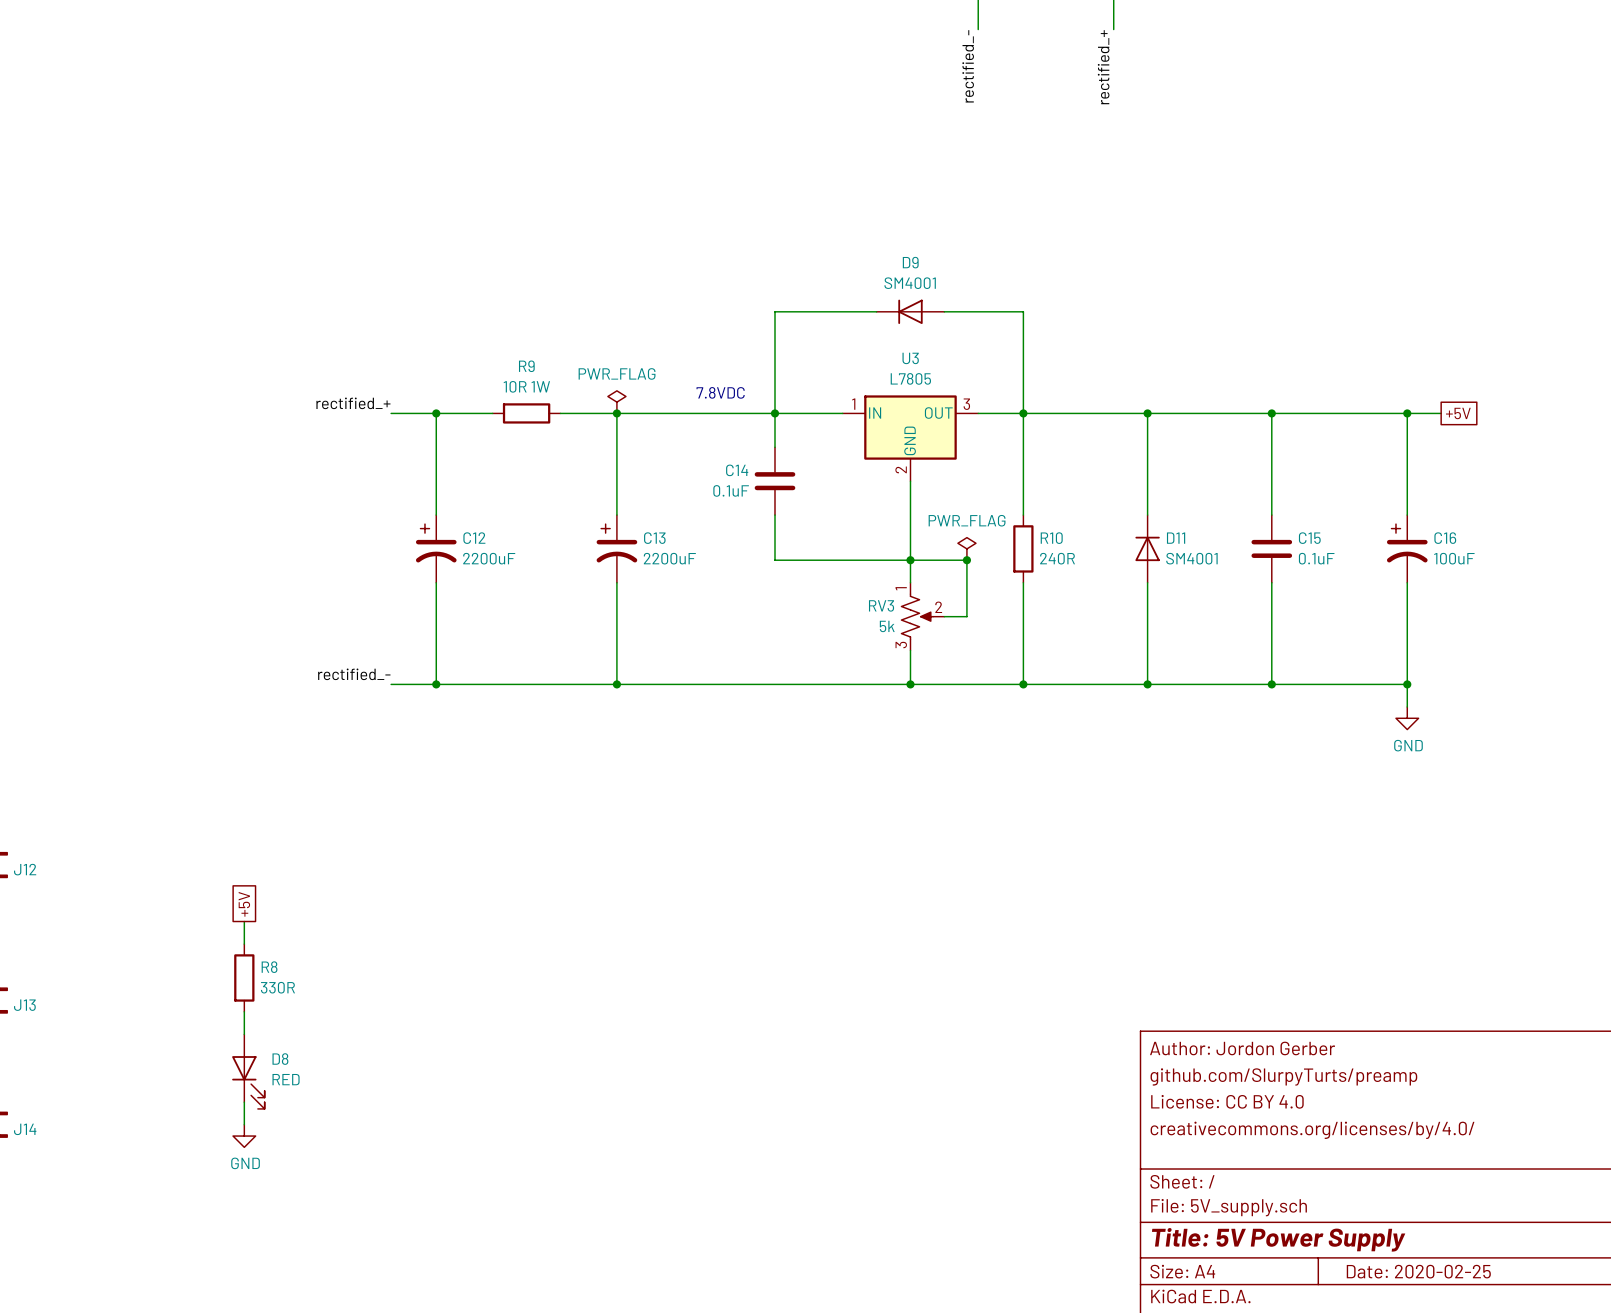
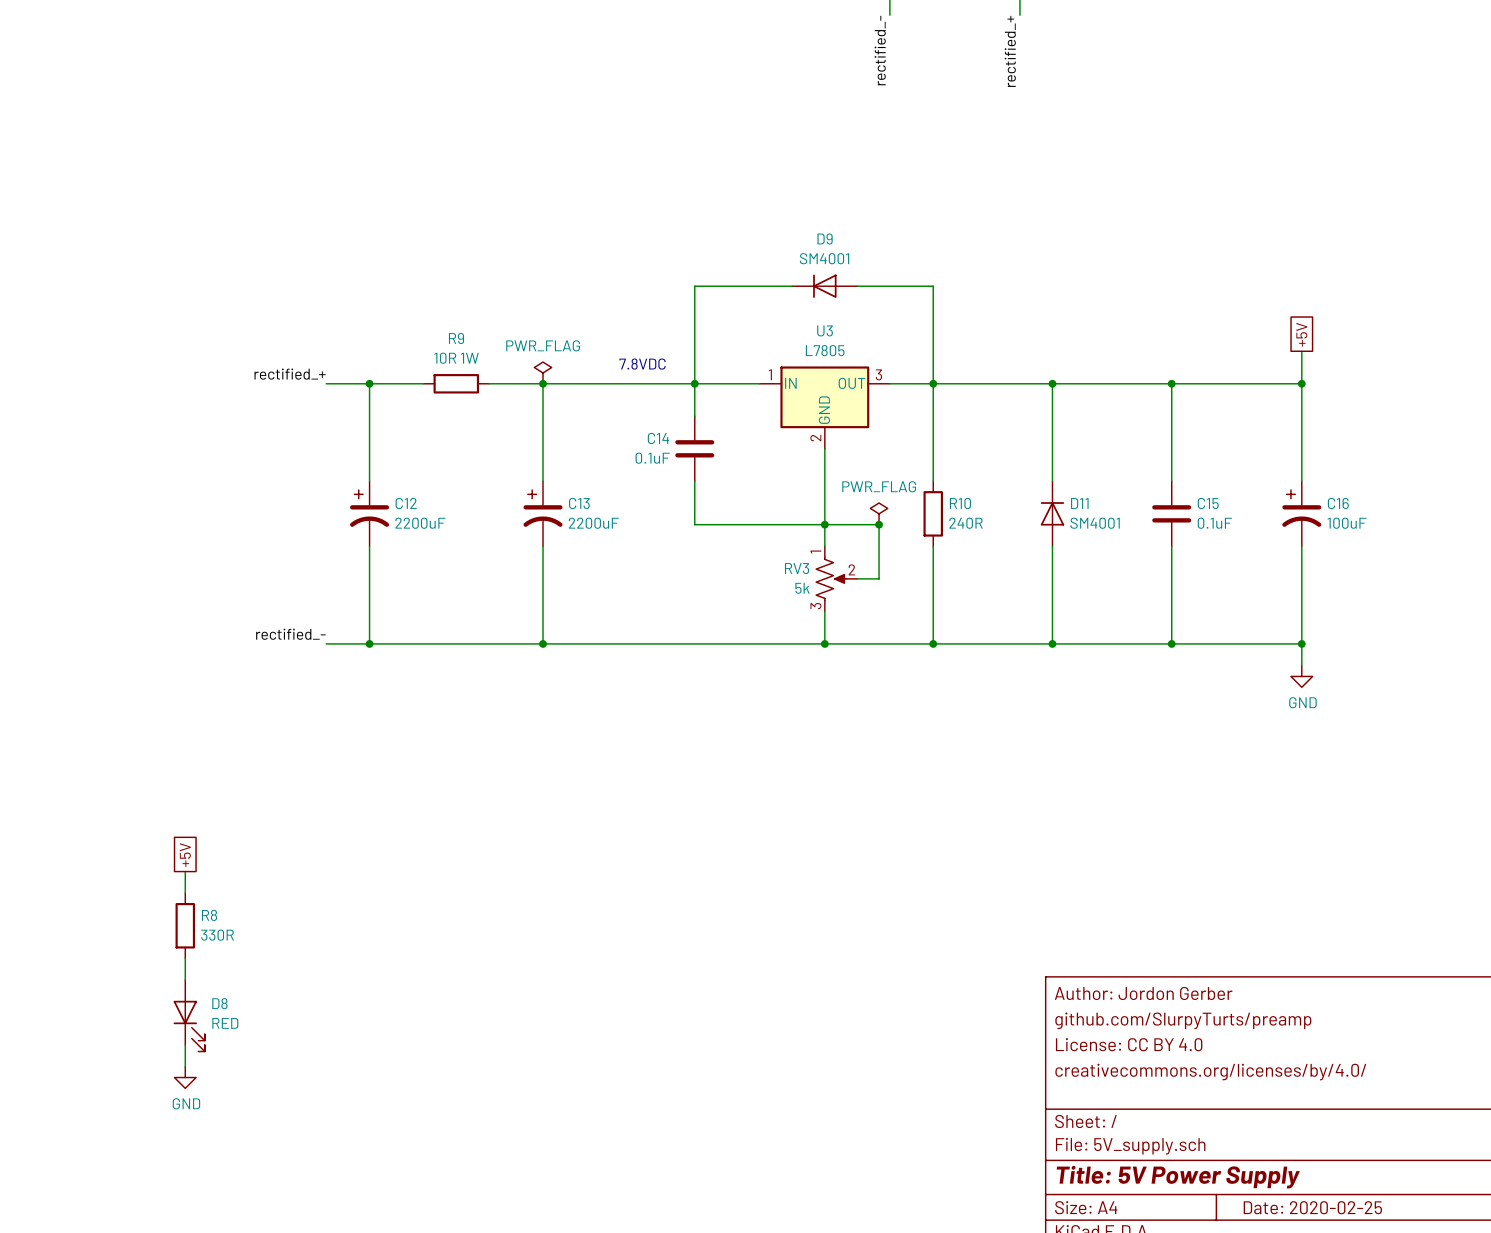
wire: (1407, 413) (1441, 413) -> (1301, 383) (1301, 351)
global label rotation: 0° (1458, 413) -> 90° counterclockwise (1301, 334)
global label position: +5V (1458, 413) -> +5V (1301, 334)

